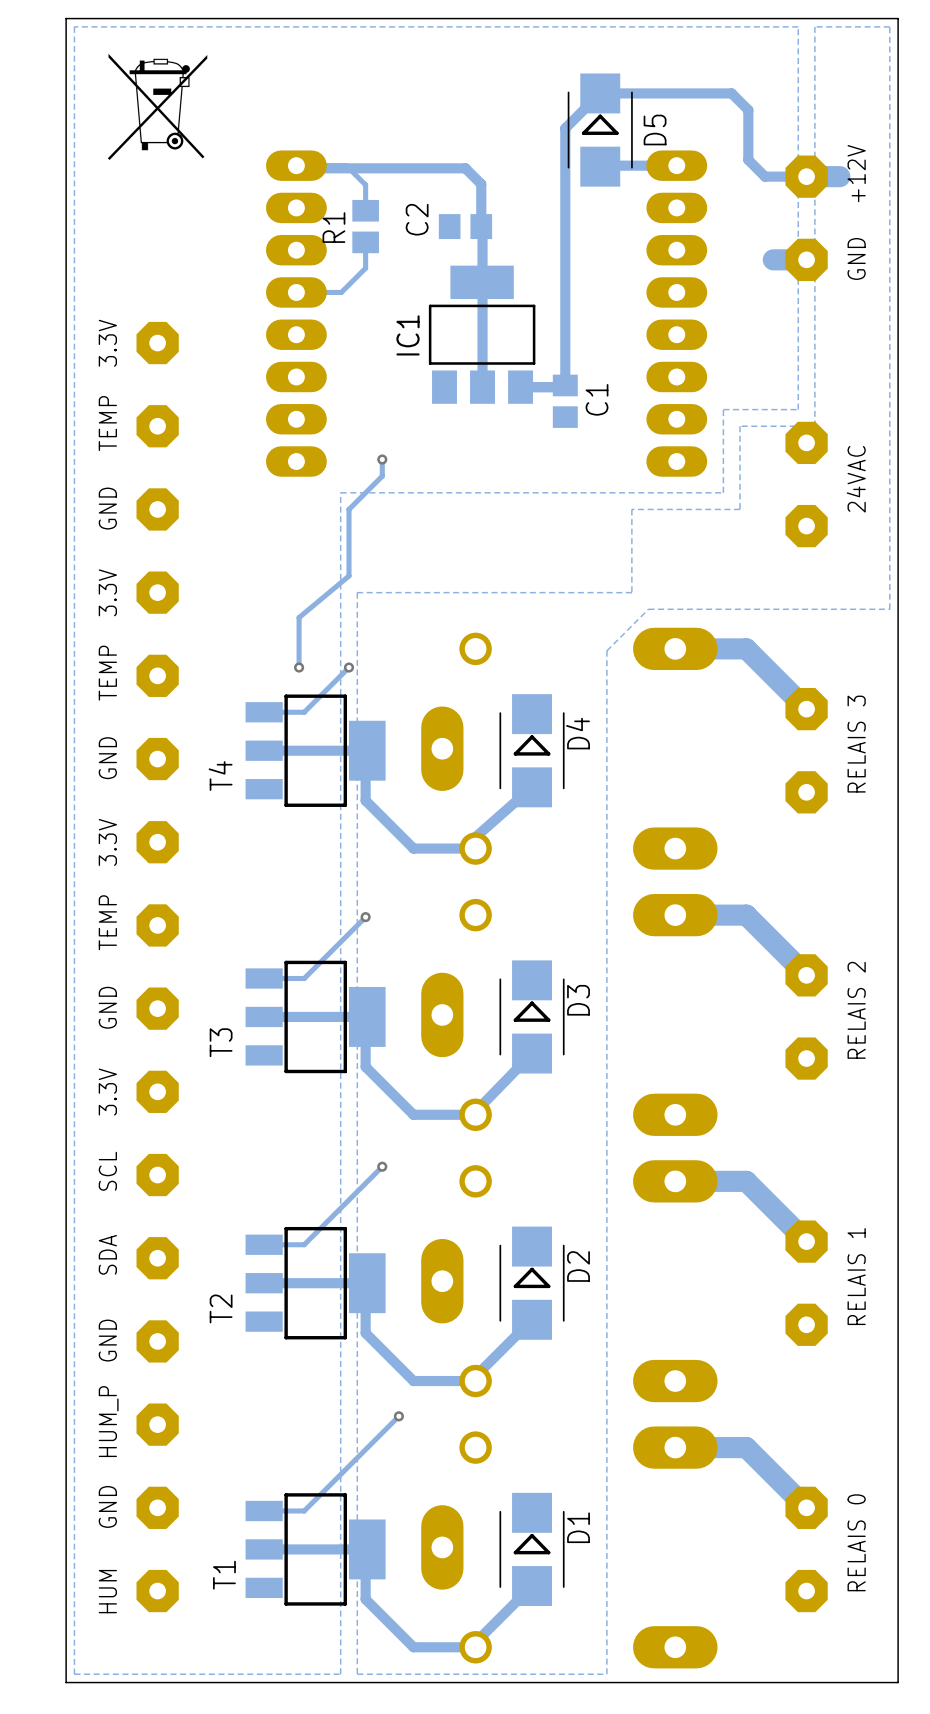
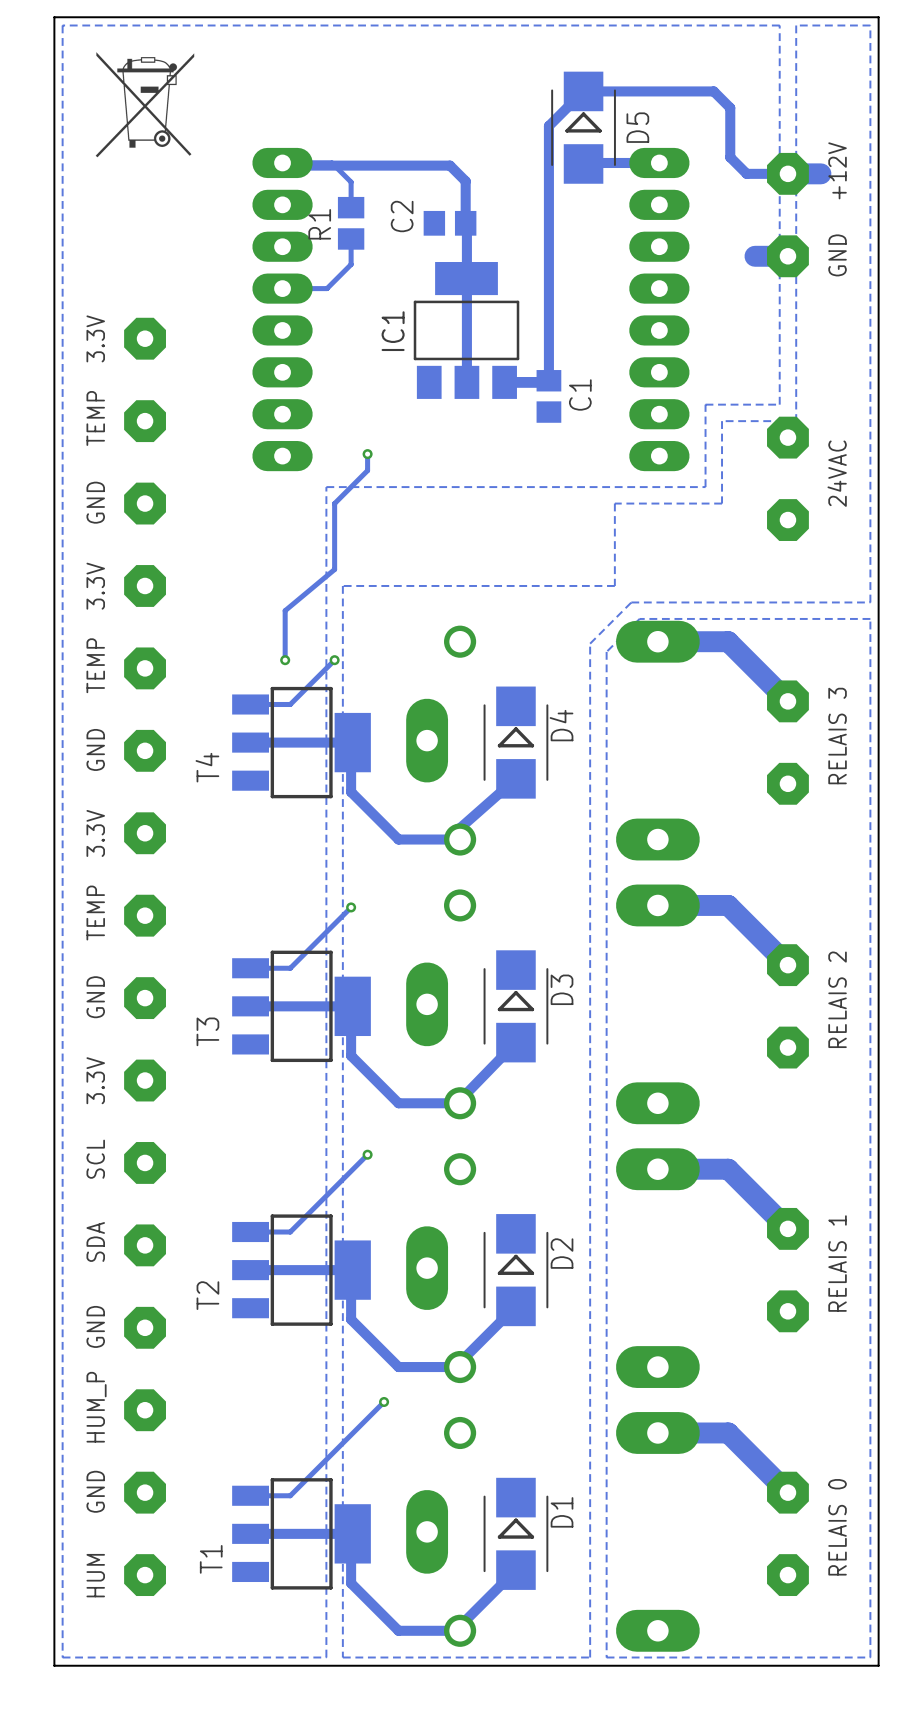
zone outline: none -> (870, 618) (639, 618) (606, 651) (606, 1657) (870, 1657) (870, 618)

